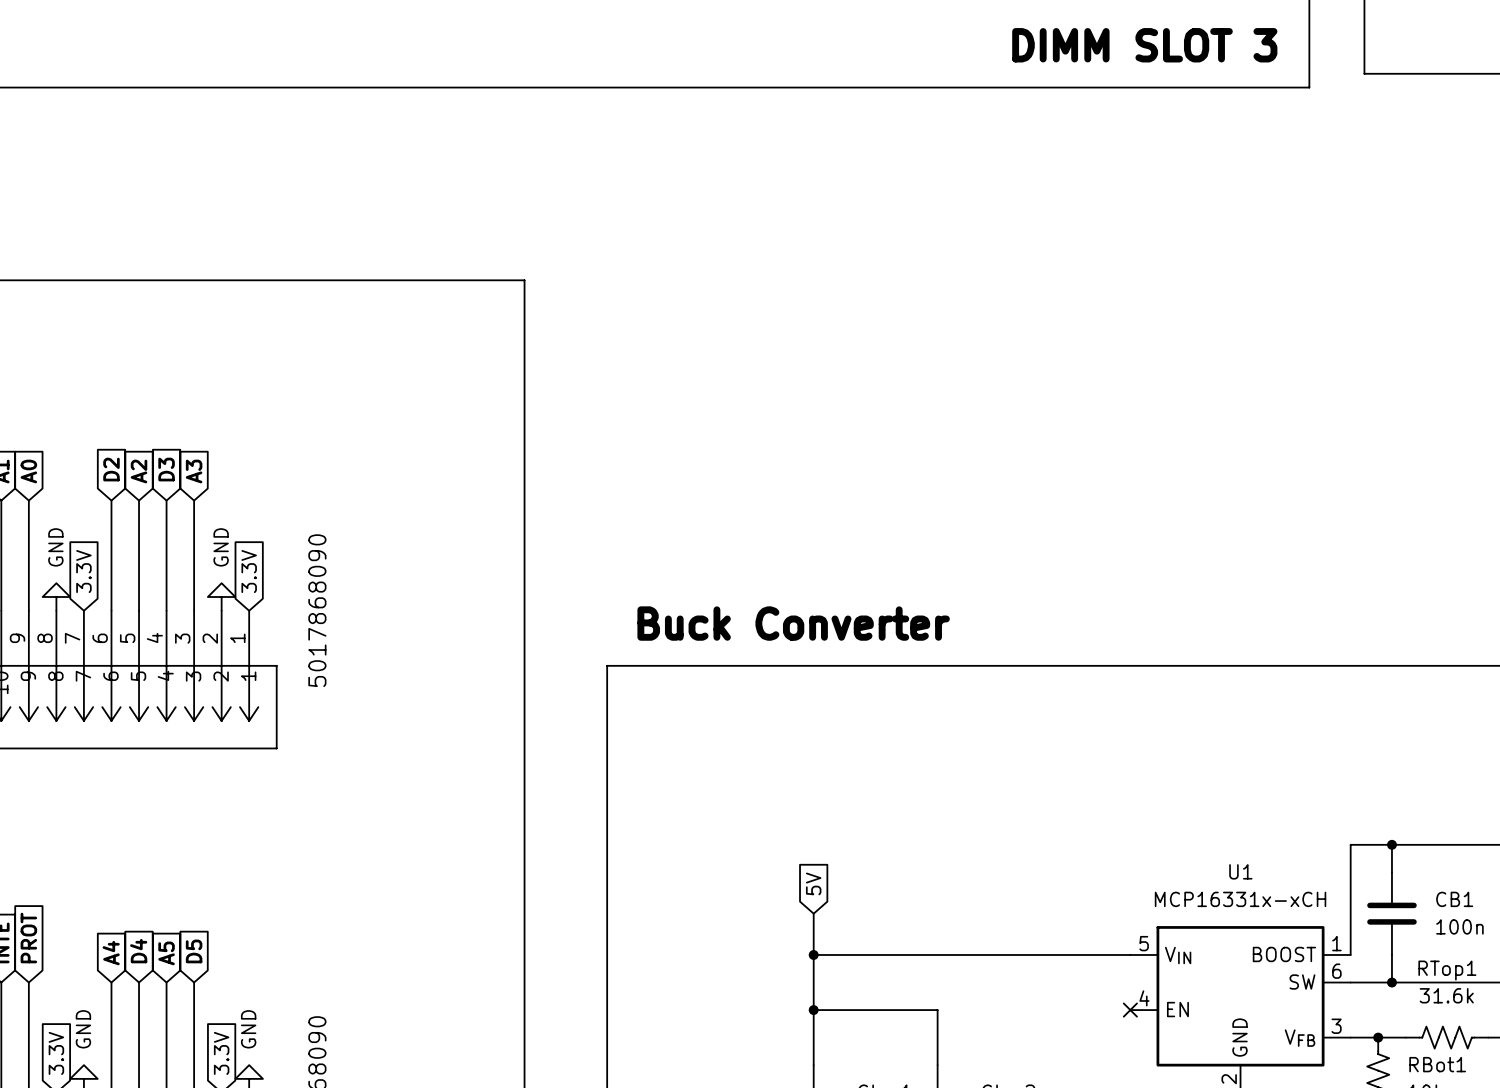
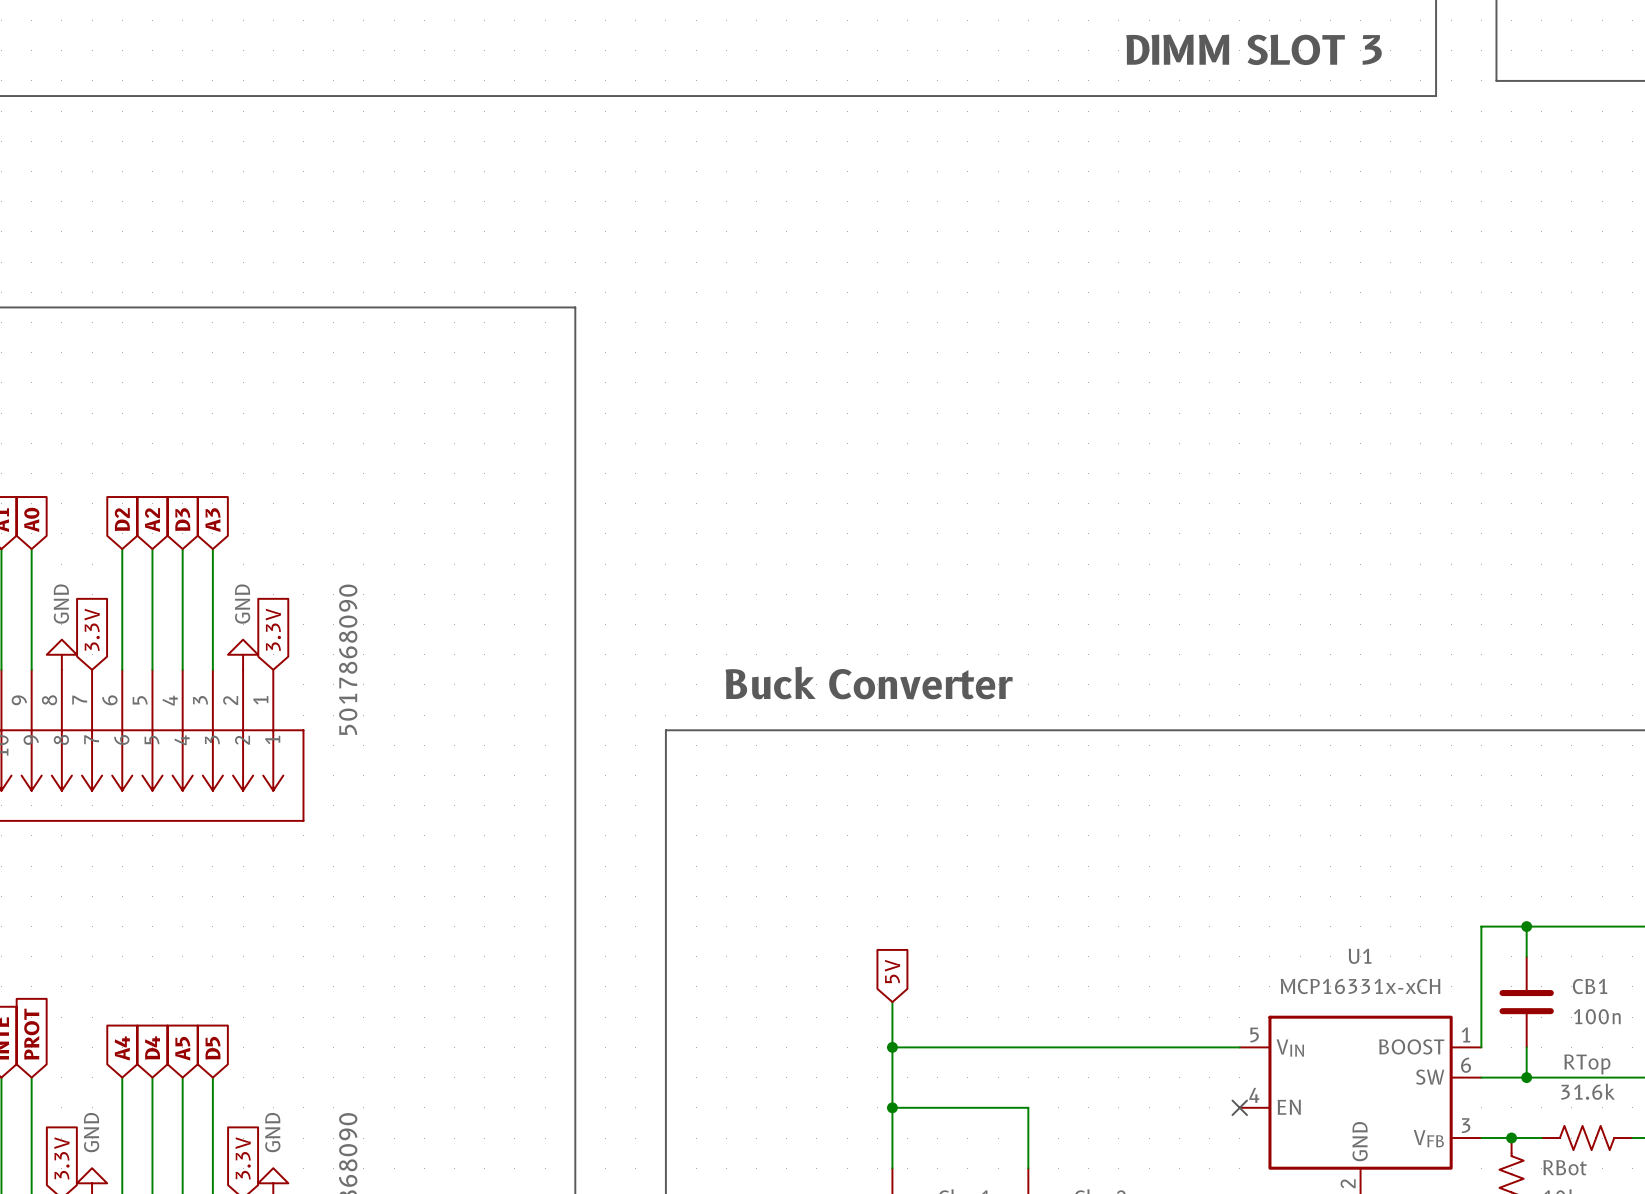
RTop1 name: RTop1 (1447, 970) -> RTop (1587, 1064)
RBot1 name: RBot1 (1437, 1064) -> RBot (1565, 1167)

